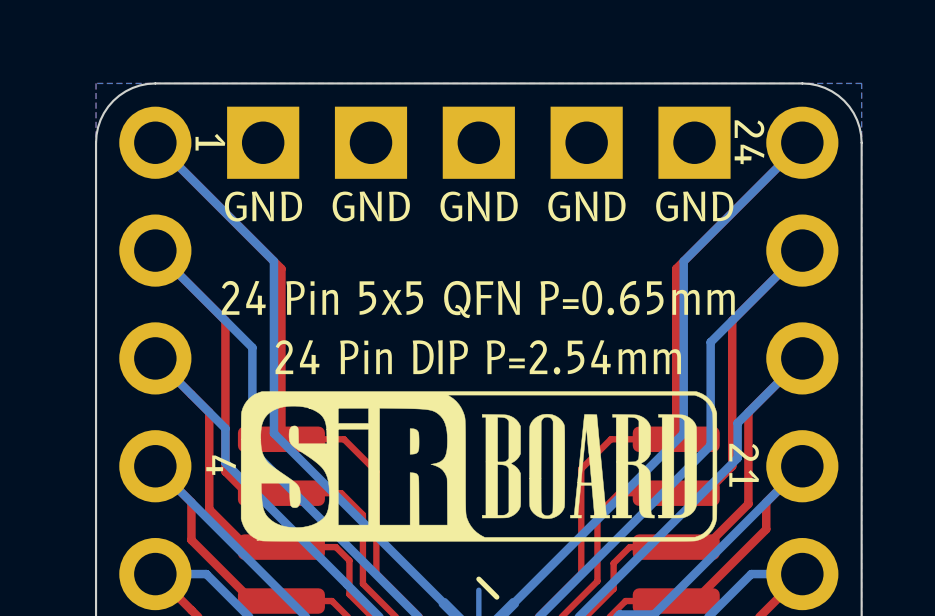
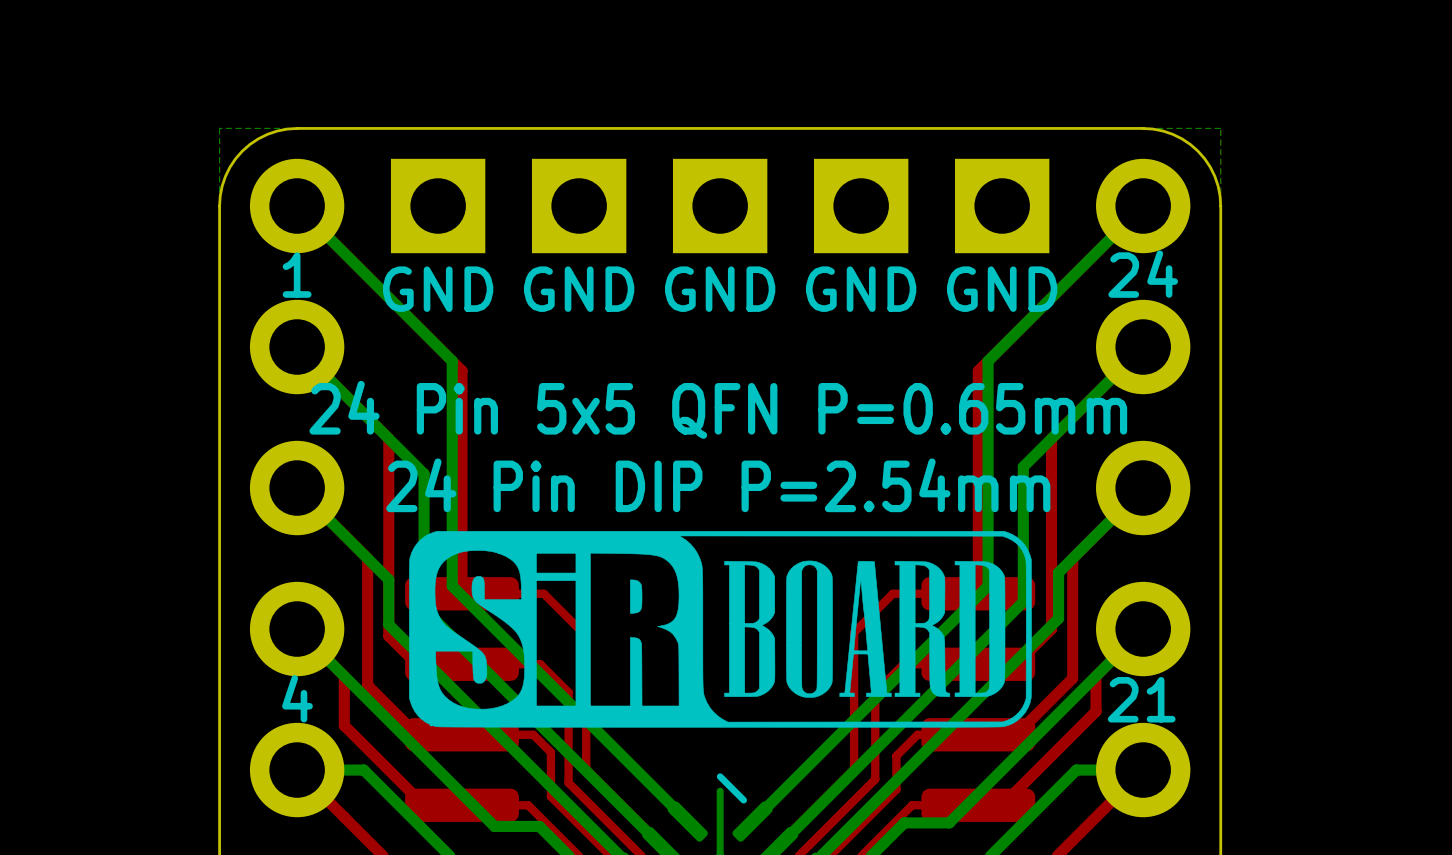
text rotation: 0° (210, 142) -> 90° counterclockwise (297, 275)
text position: 1 (210, 142) -> 1 (297, 275)
text rotation: 0° (749, 142) -> 90° counterclockwise (1143, 274)
text position: 24 (749, 142) -> 24 (1143, 274)
text rotation: 0° (221, 465) -> 90° counterclockwise (297, 698)
text position: 4 (221, 465) -> 4 (297, 698)
text rotation: 0° (744, 465) -> 90° counterclockwise (1141, 699)
text position: 21 (744, 465) -> 21 (1141, 699)

